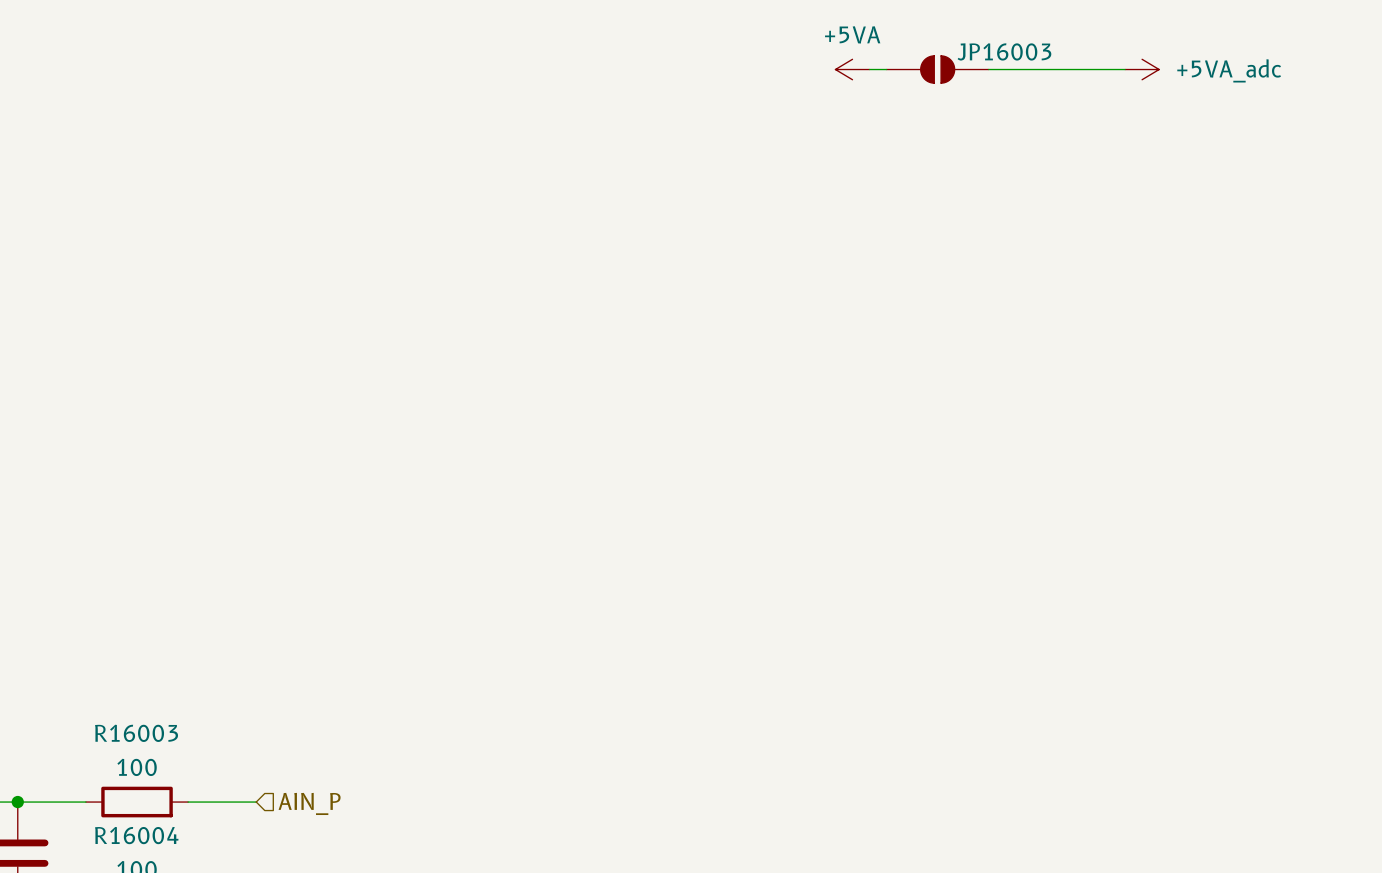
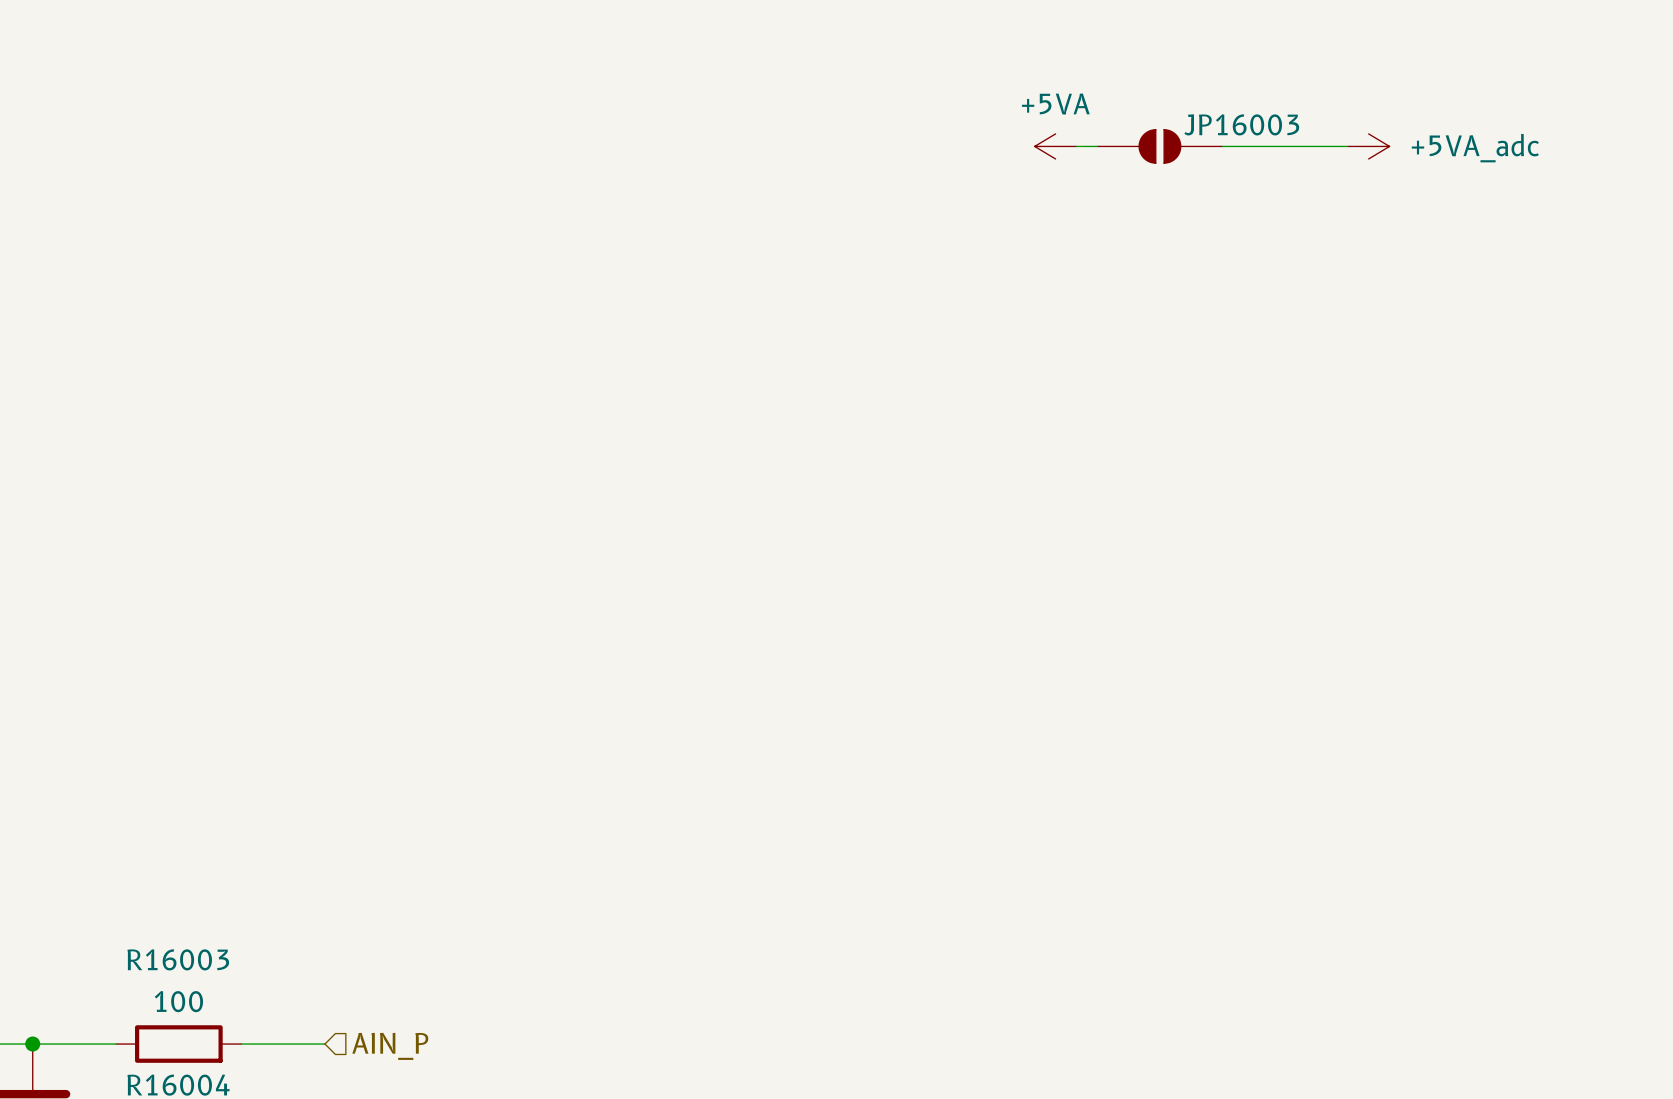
power symbol position: +5VA_adc (1142, 69) -> +5VA_adc (1368, 146)

